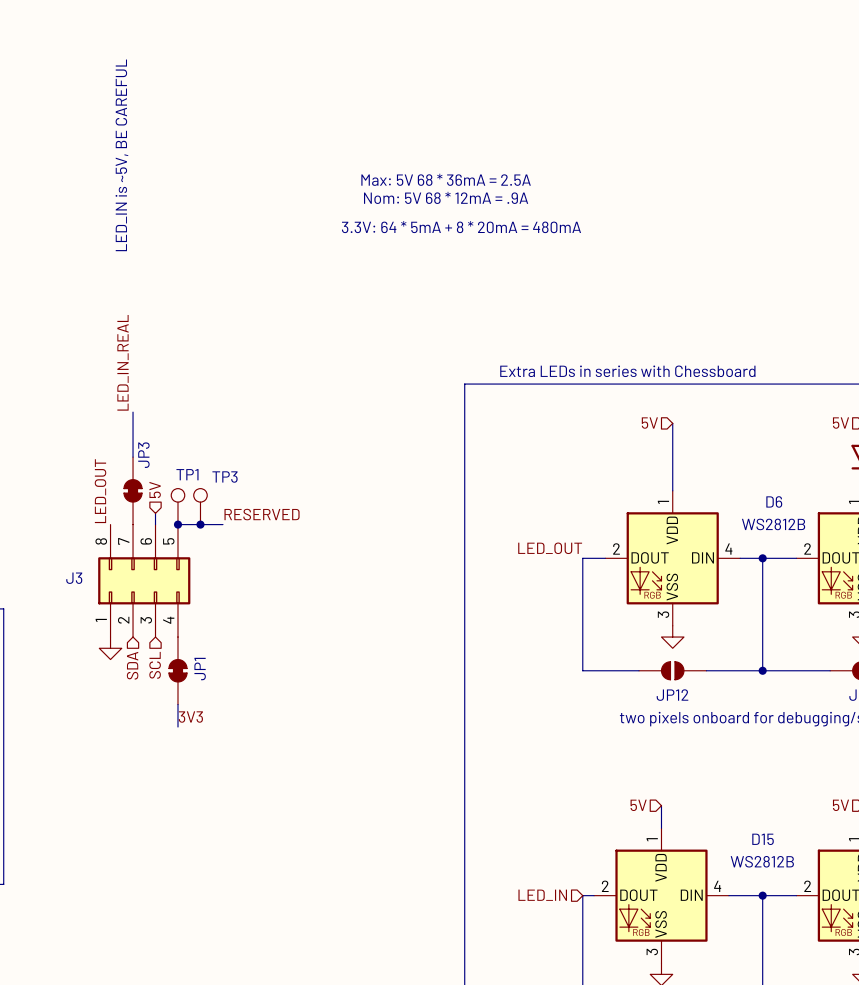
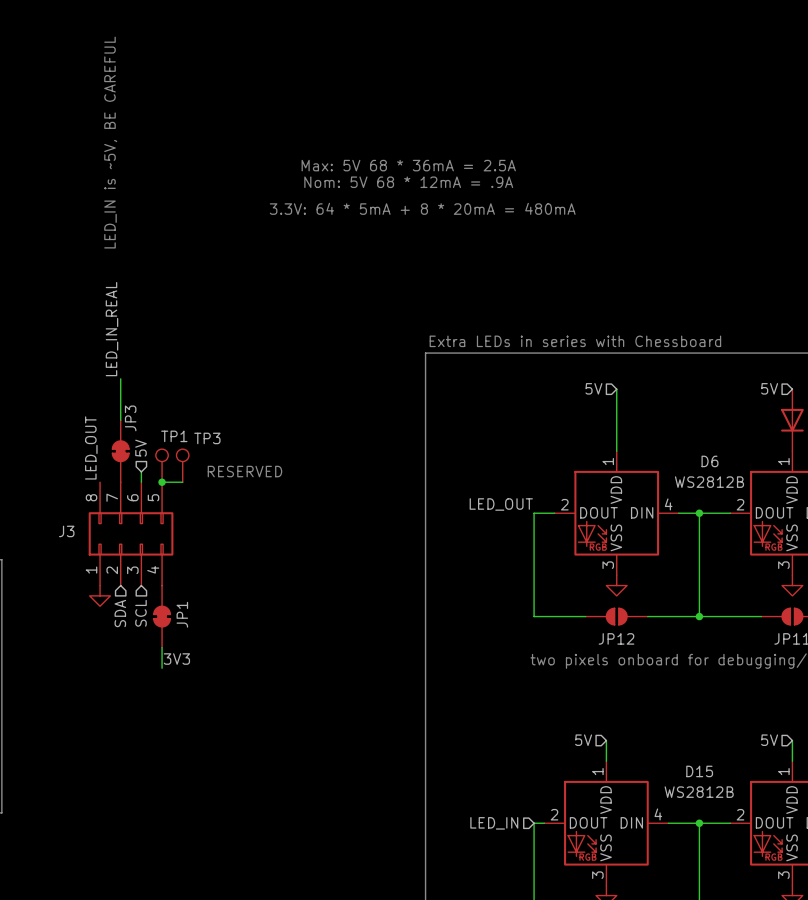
text: none -> RESERVED (244, 471)
label: RESERVED (262, 514) -> none
wire: (200, 524) (222, 524) -> none
junction: (200, 524) -> none

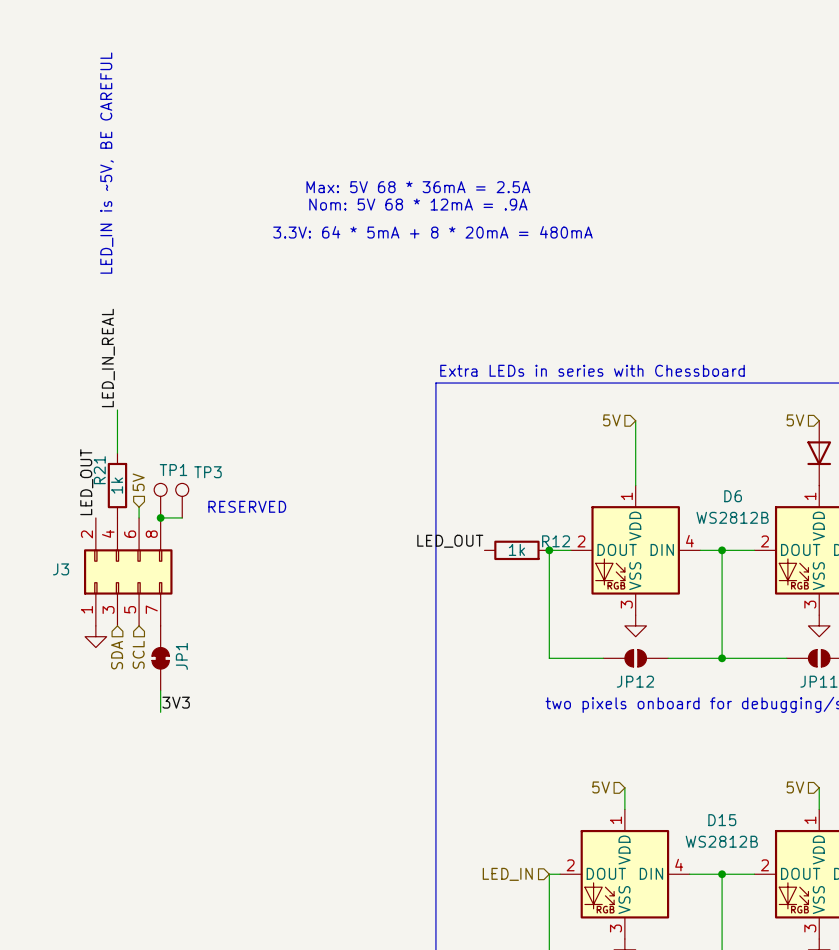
JP3: (120, 451) -> none
R21: none -> 1k (117, 485)
J3 pin number: 8 (91, 497) -> 2 (86, 534)
J3 pin number: 7 (112, 497) -> 4 (108, 533)
J3 pin number: 5 (153, 497) -> 8 (151, 534)
label position: LED_OUT (501, 504) -> LED_OUT (450, 541)
R12: none -> 1k (516, 550)
junction: none -> (549, 550)
J3 pin number: 4 (153, 569) -> 7 (151, 609)
J3 pin number: 2 (112, 570) -> 3 (108, 609)
J3 pin number: 3 (132, 570) -> 5 (130, 609)

